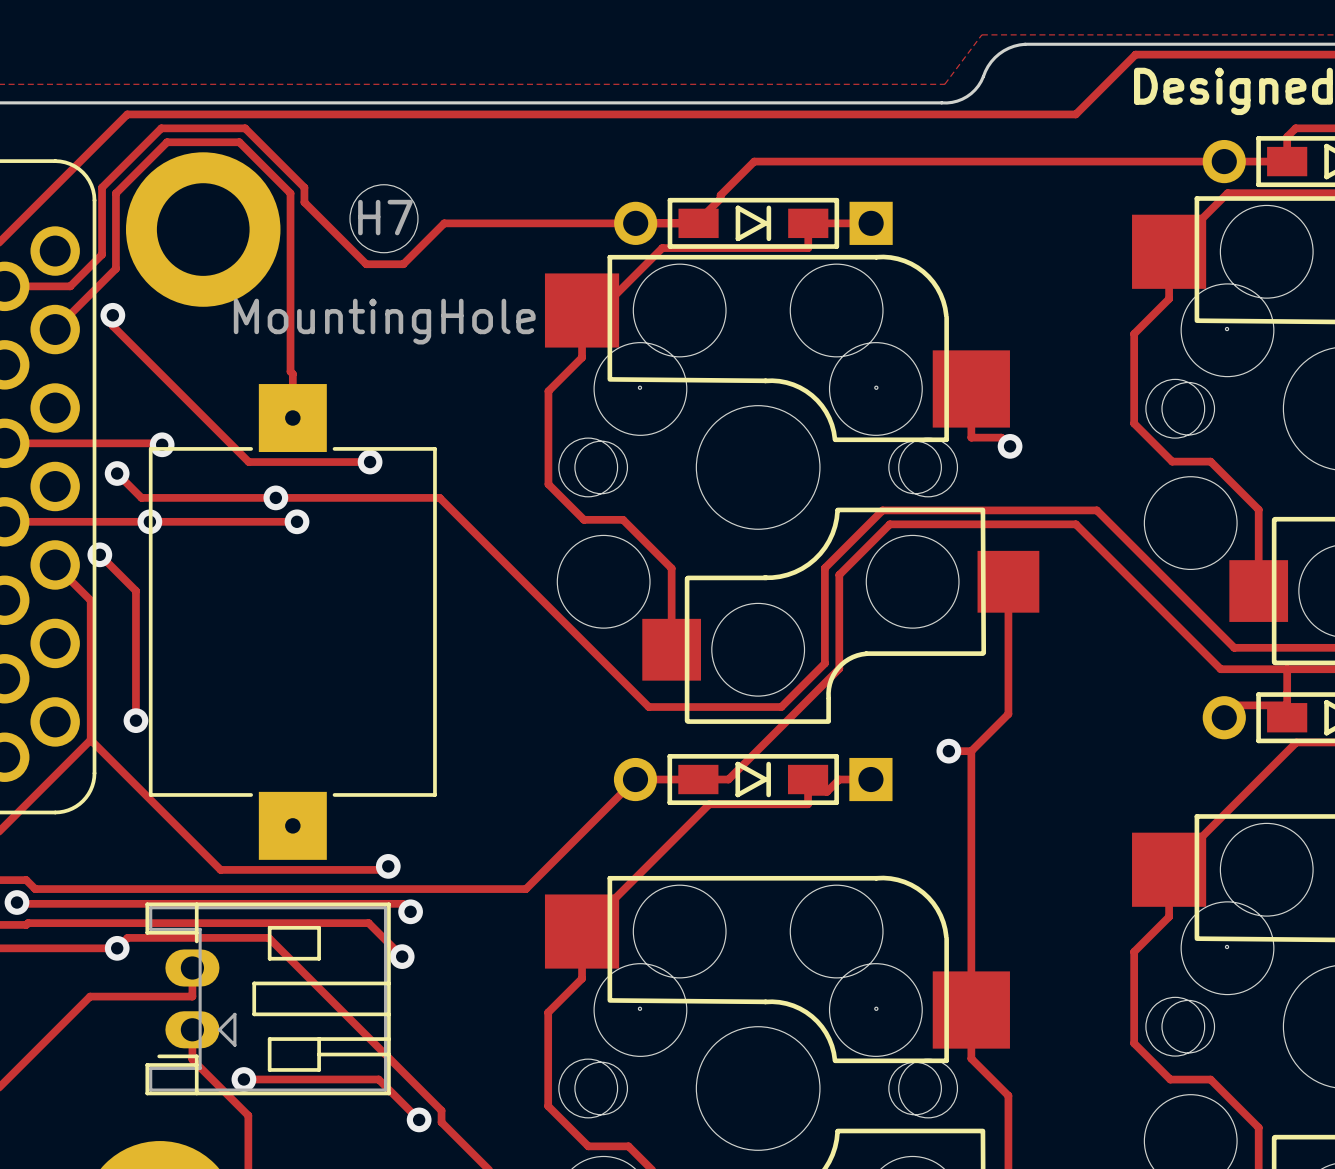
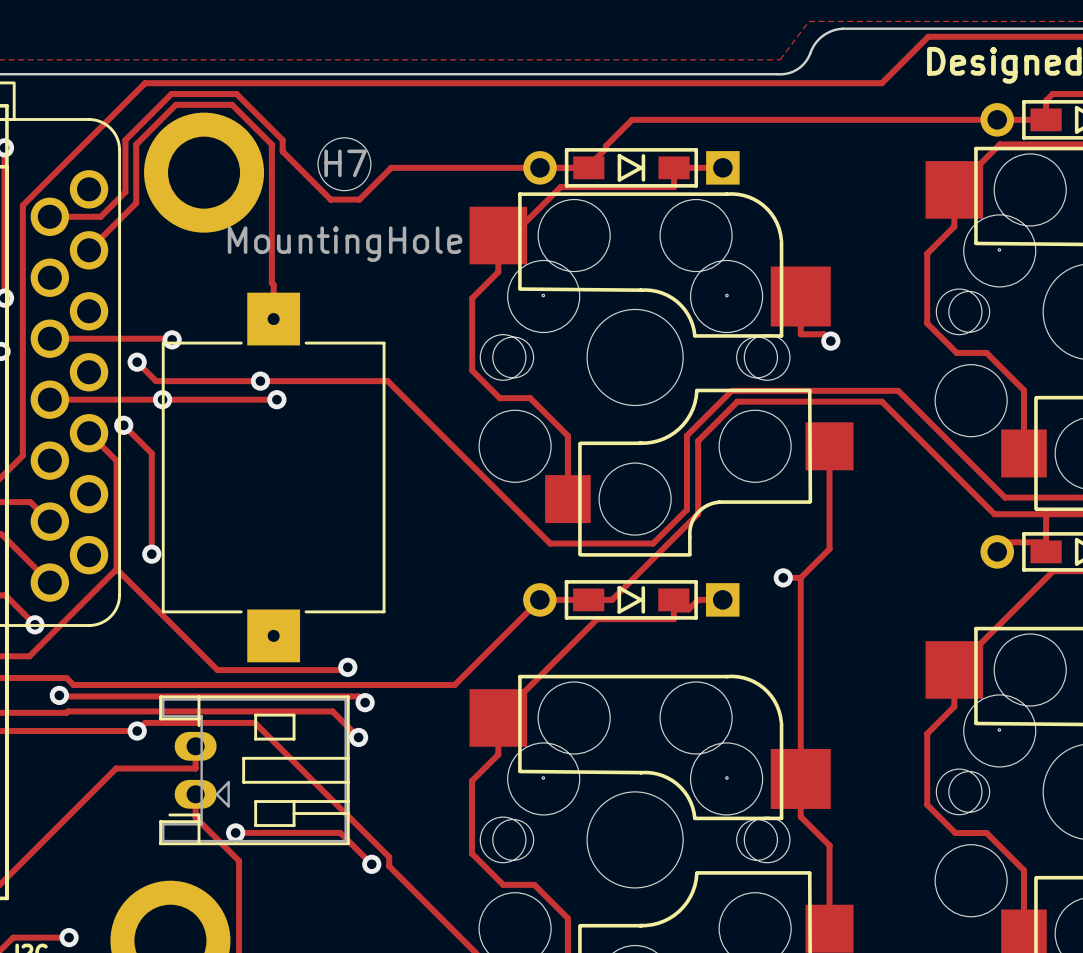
track: (112, 315) (112, 326) (248, 462) (370, 462) -> none
via: (112, 315) -> none
via: (370, 462) -> none

